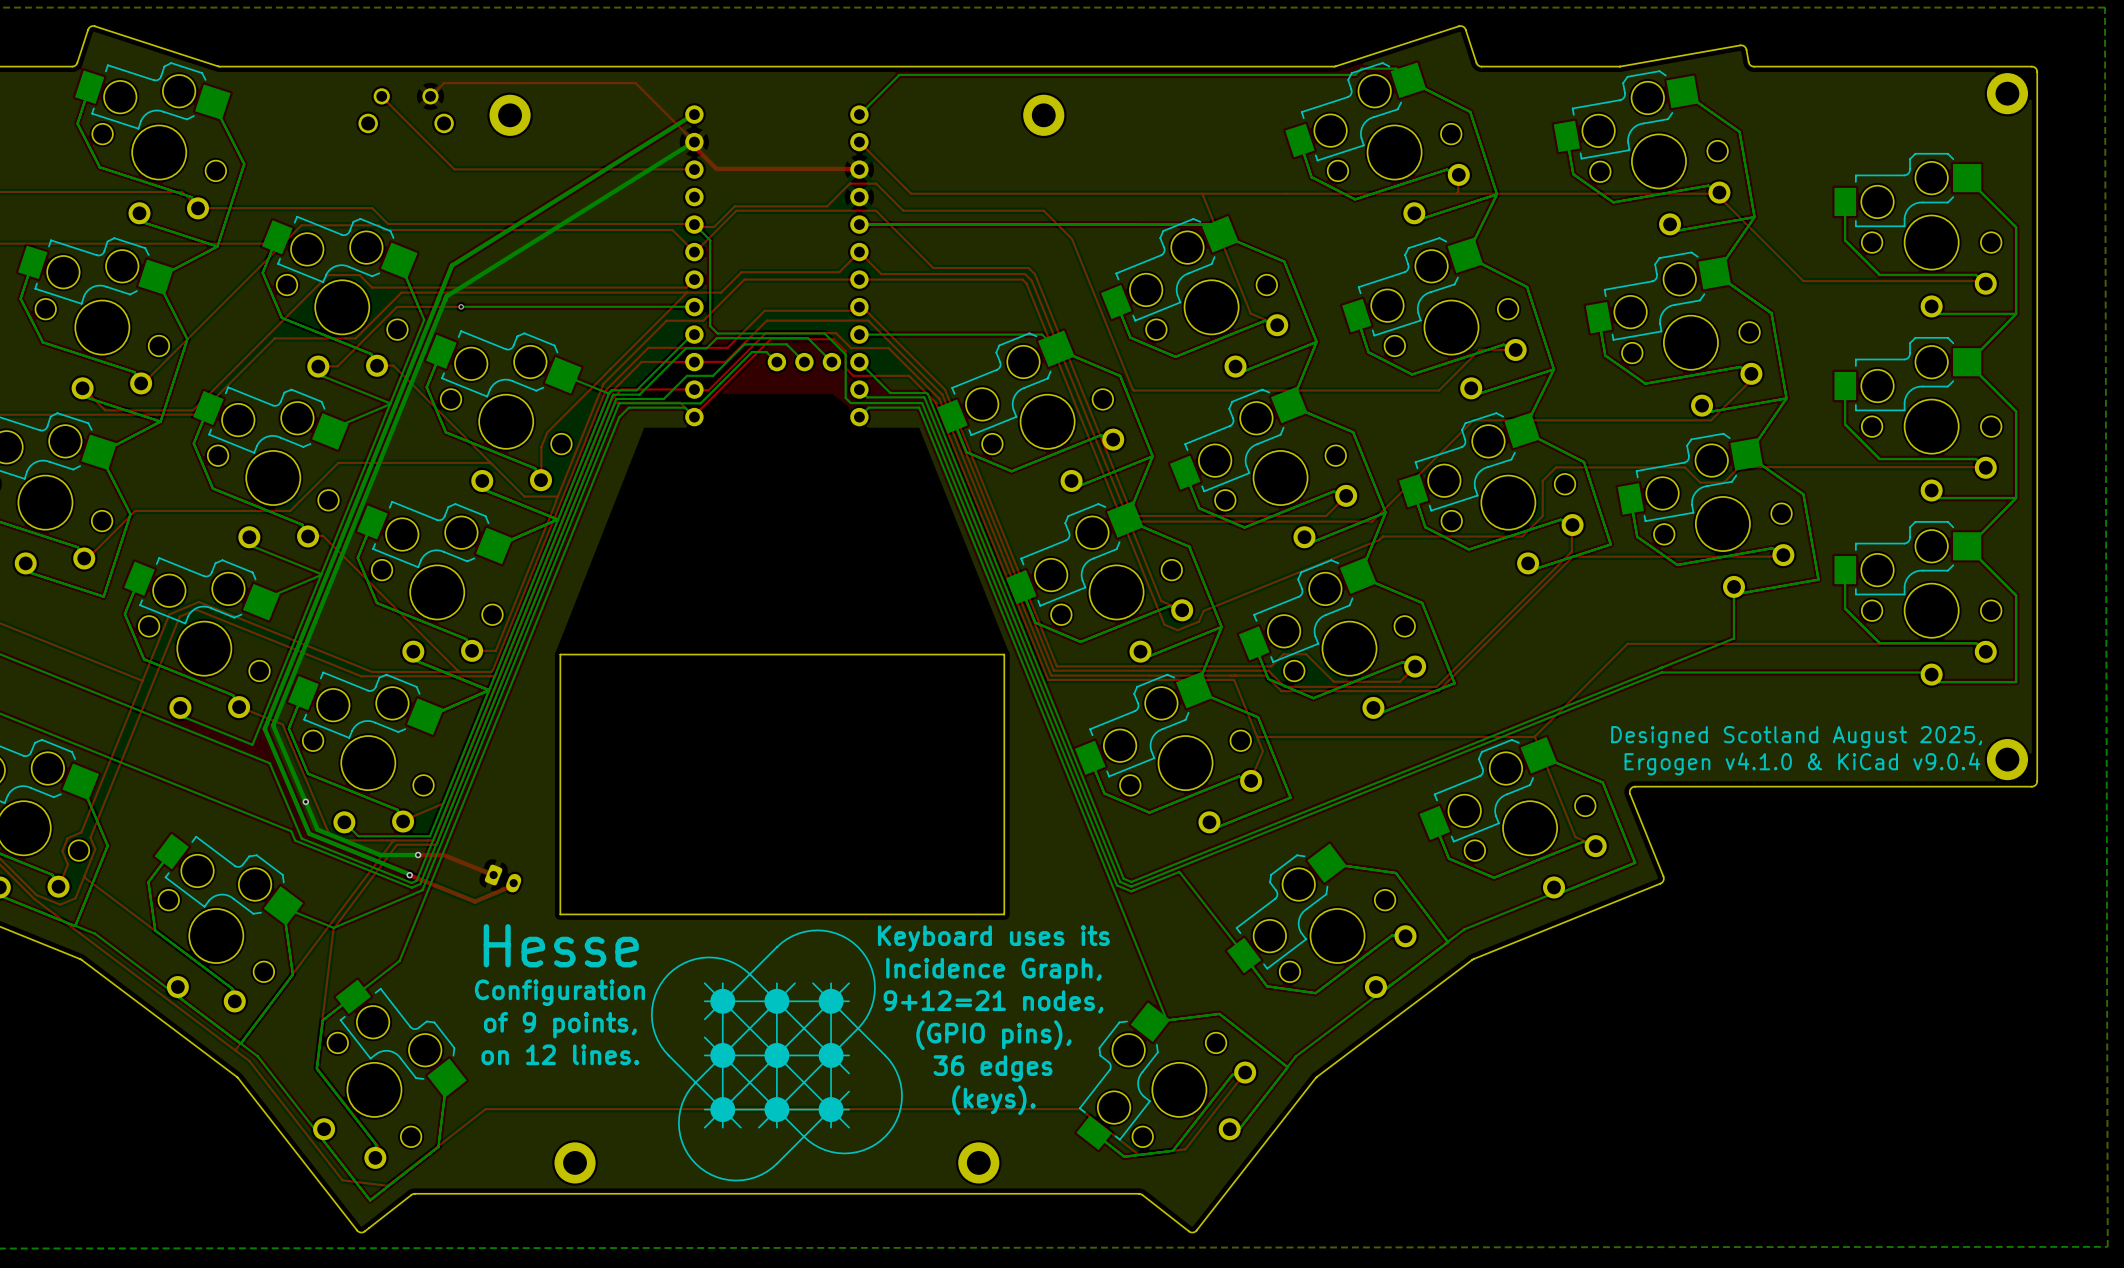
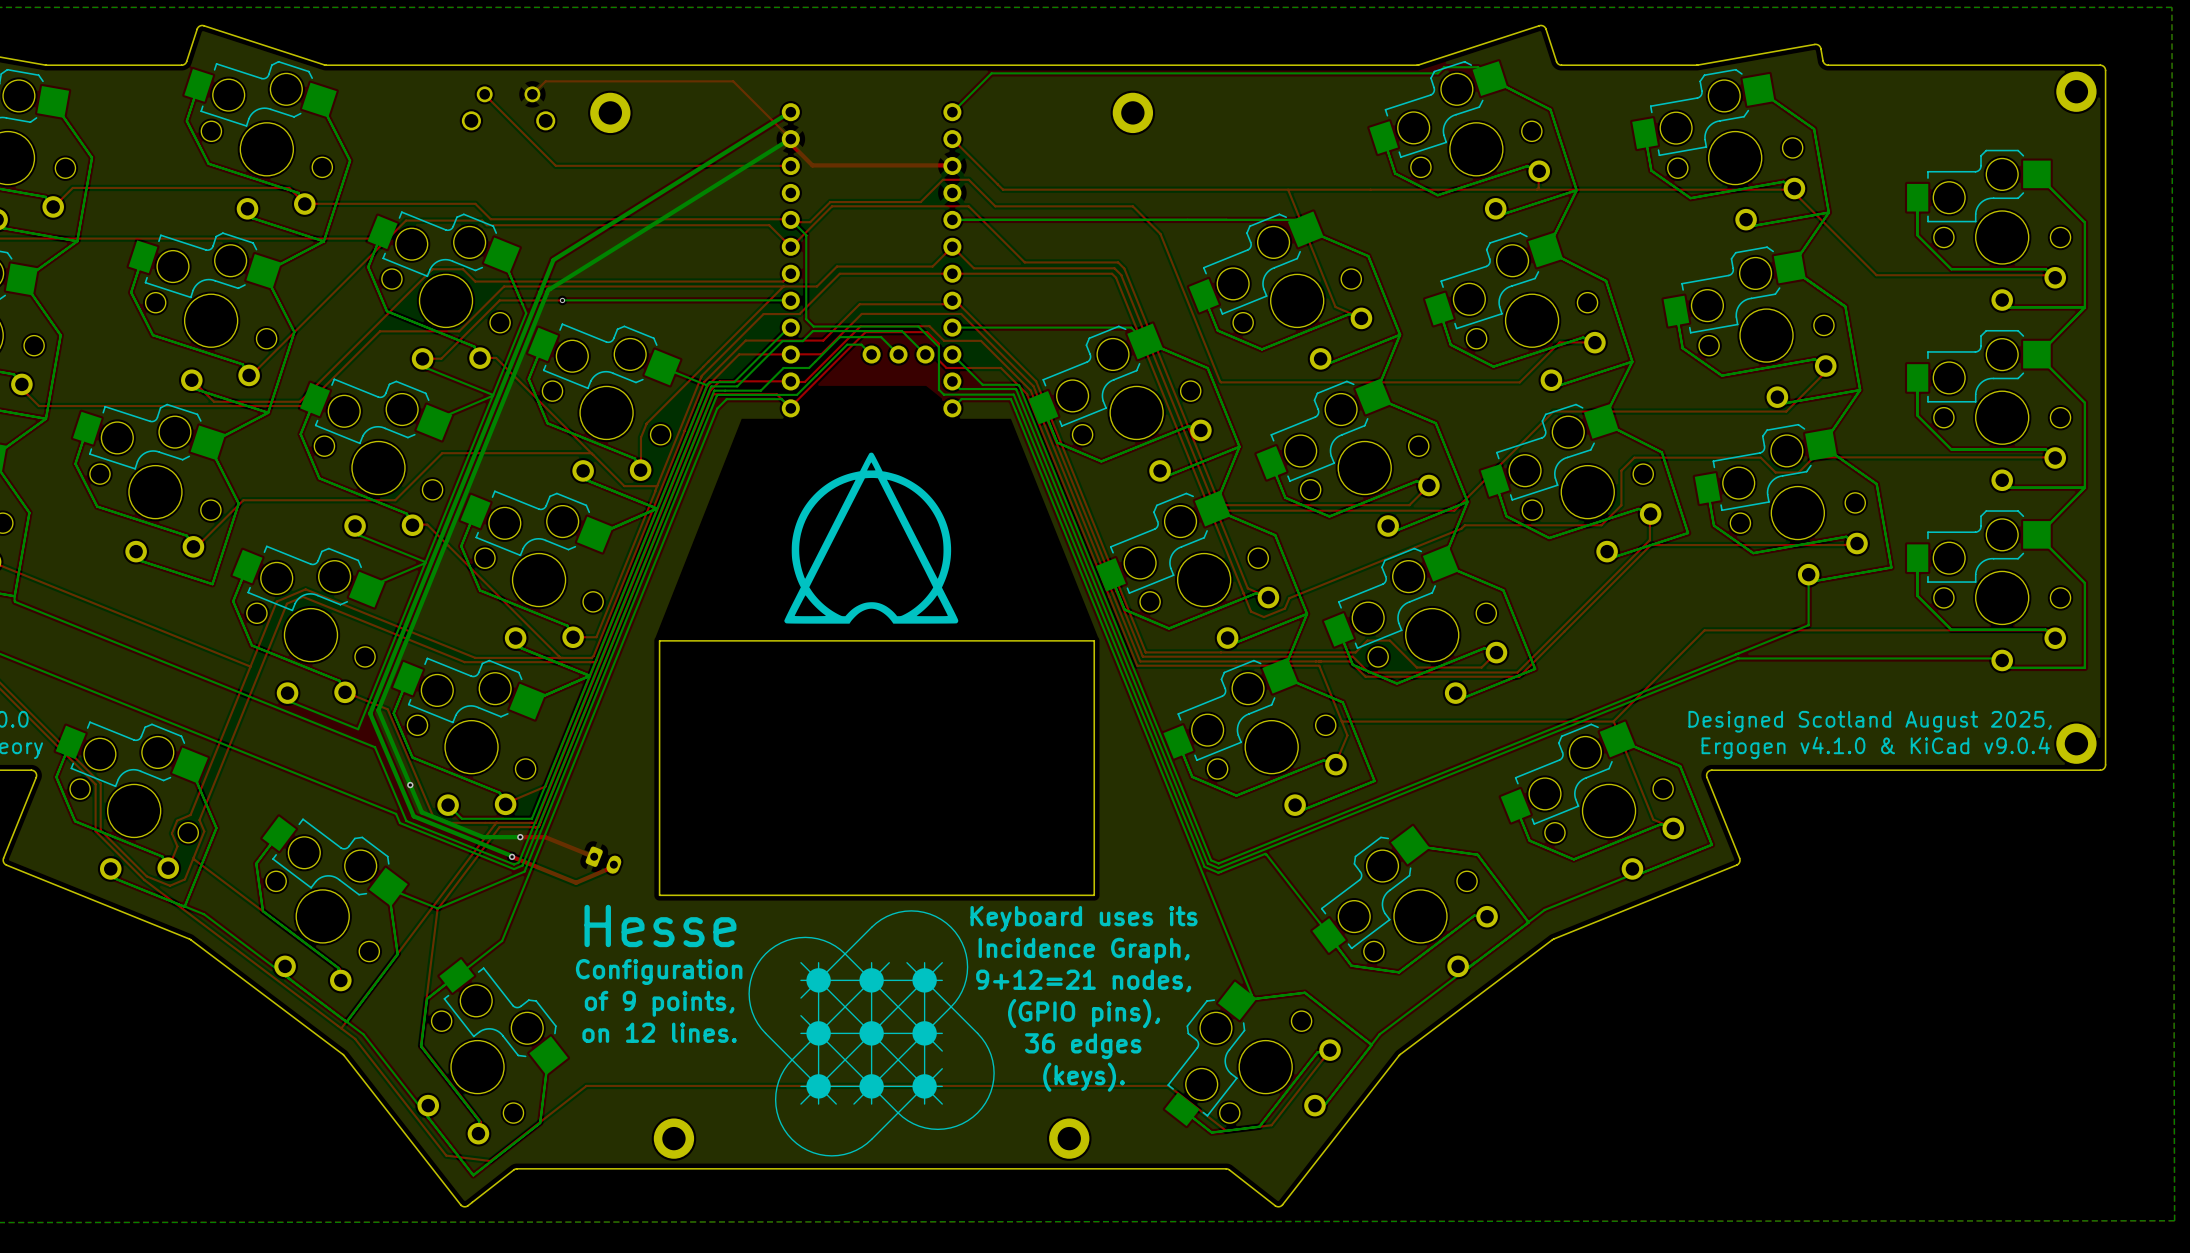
drawing: none -> [784, 452, 959, 624]

